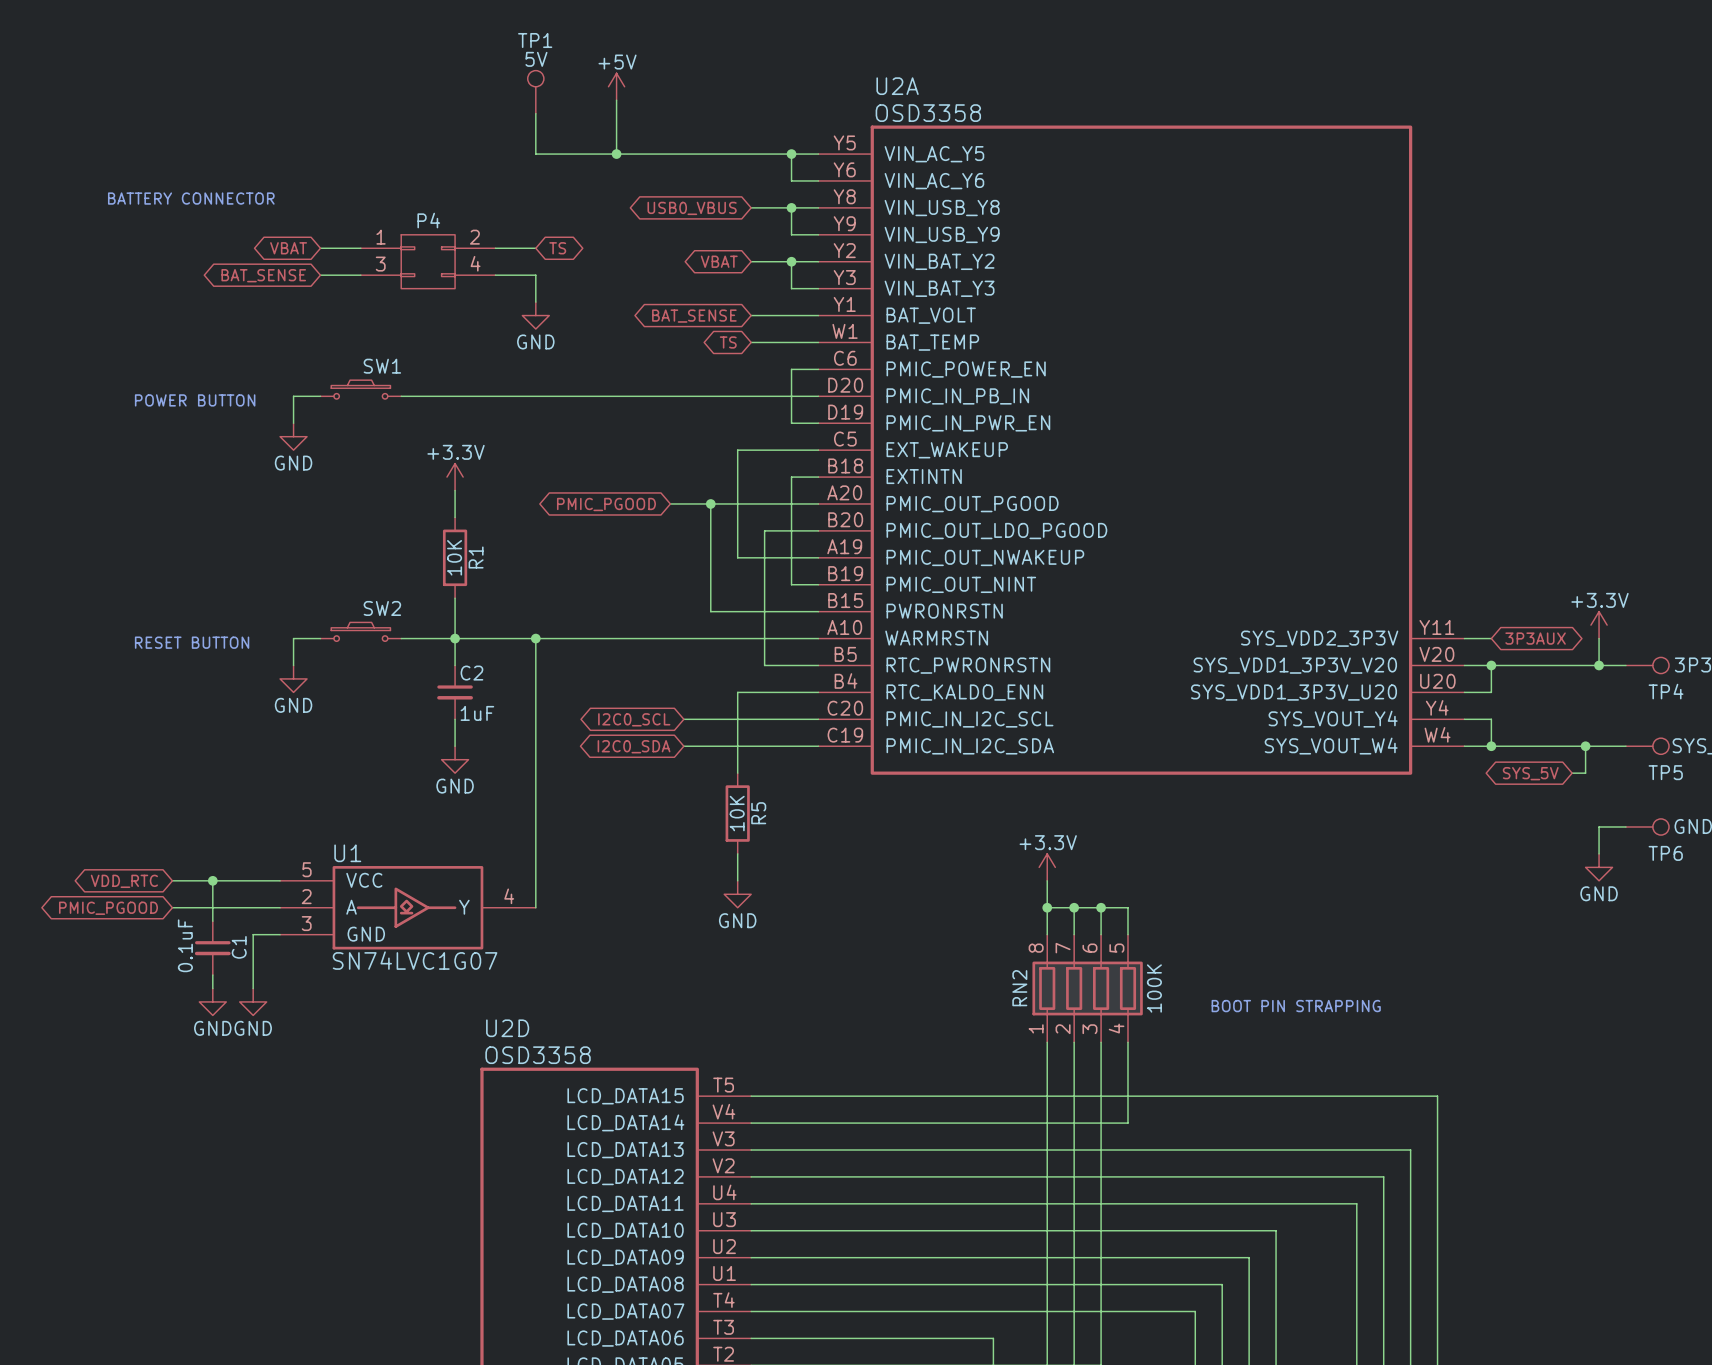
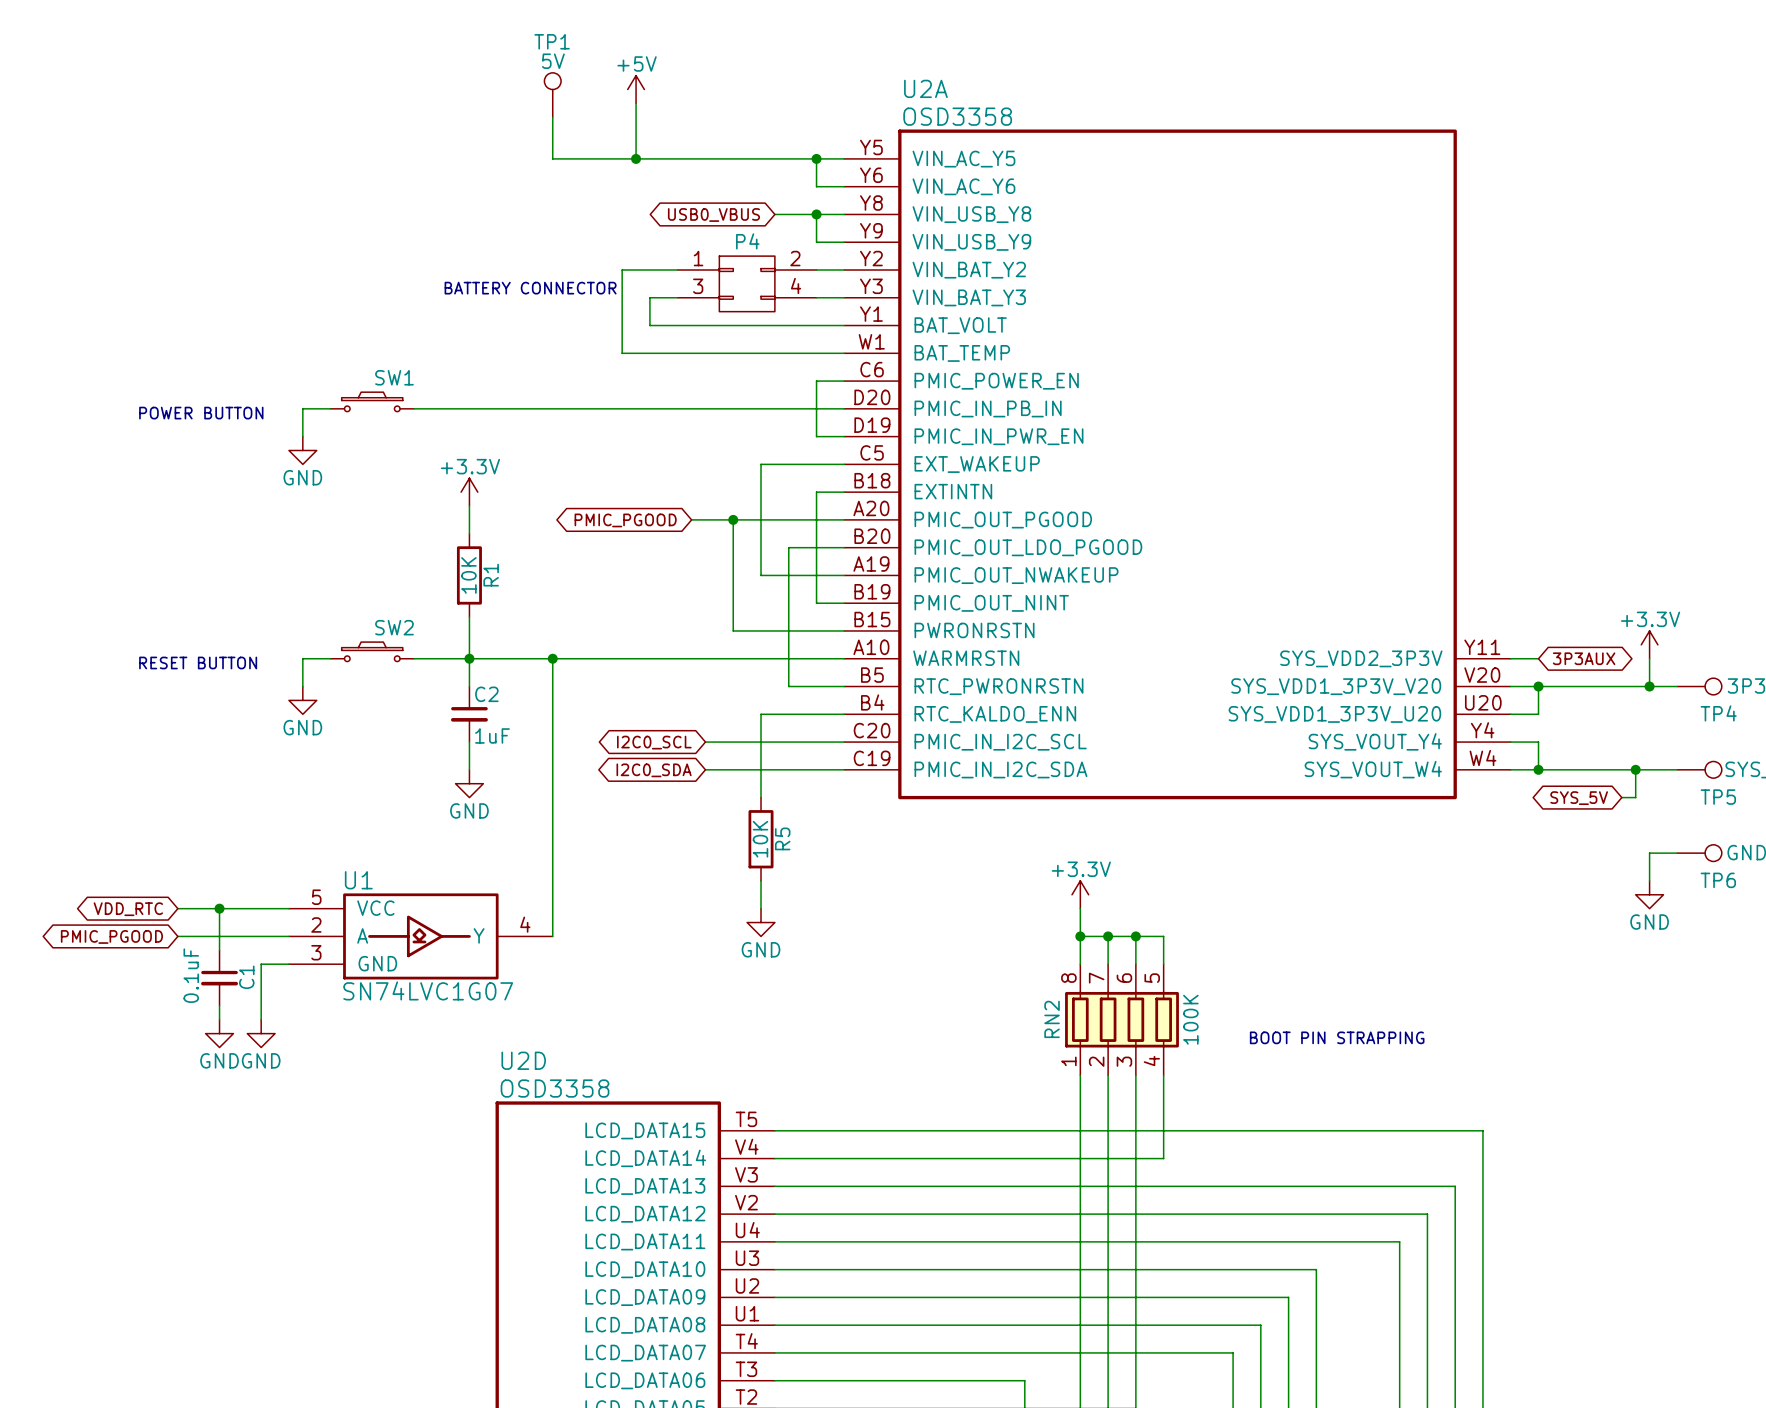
text: BATTERY CONNECTOR (191, 198) -> none
global label: VBAT (288, 248) -> none
wire: (320, 248) (360, 248) -> none
wire: (495, 248) (535, 248) -> none
global label: TS (557, 248) -> none
P4 position: (428, 261) -> (747, 283)
wire: none -> (677, 270) (622, 270) (622, 353) (774, 353)
global label: VBAT (719, 261) -> none
wire: (751, 261) (791, 261) (791, 288) -> none
junction: (791, 261) -> none
global label: BAT_SENSE (263, 275) -> none
wire: (320, 275) (360, 275) -> none
wire: (495, 275) (535, 275) (535, 302) -> none
text: none -> BATTERY CONNECTOR (530, 288)
wire: none -> (677, 297) (649, 297) (649, 325) (774, 325)
power symbol: GND (535, 315) -> none
global label: BAT_SENSE (694, 316) -> none
global label: TS (728, 342) -> none

